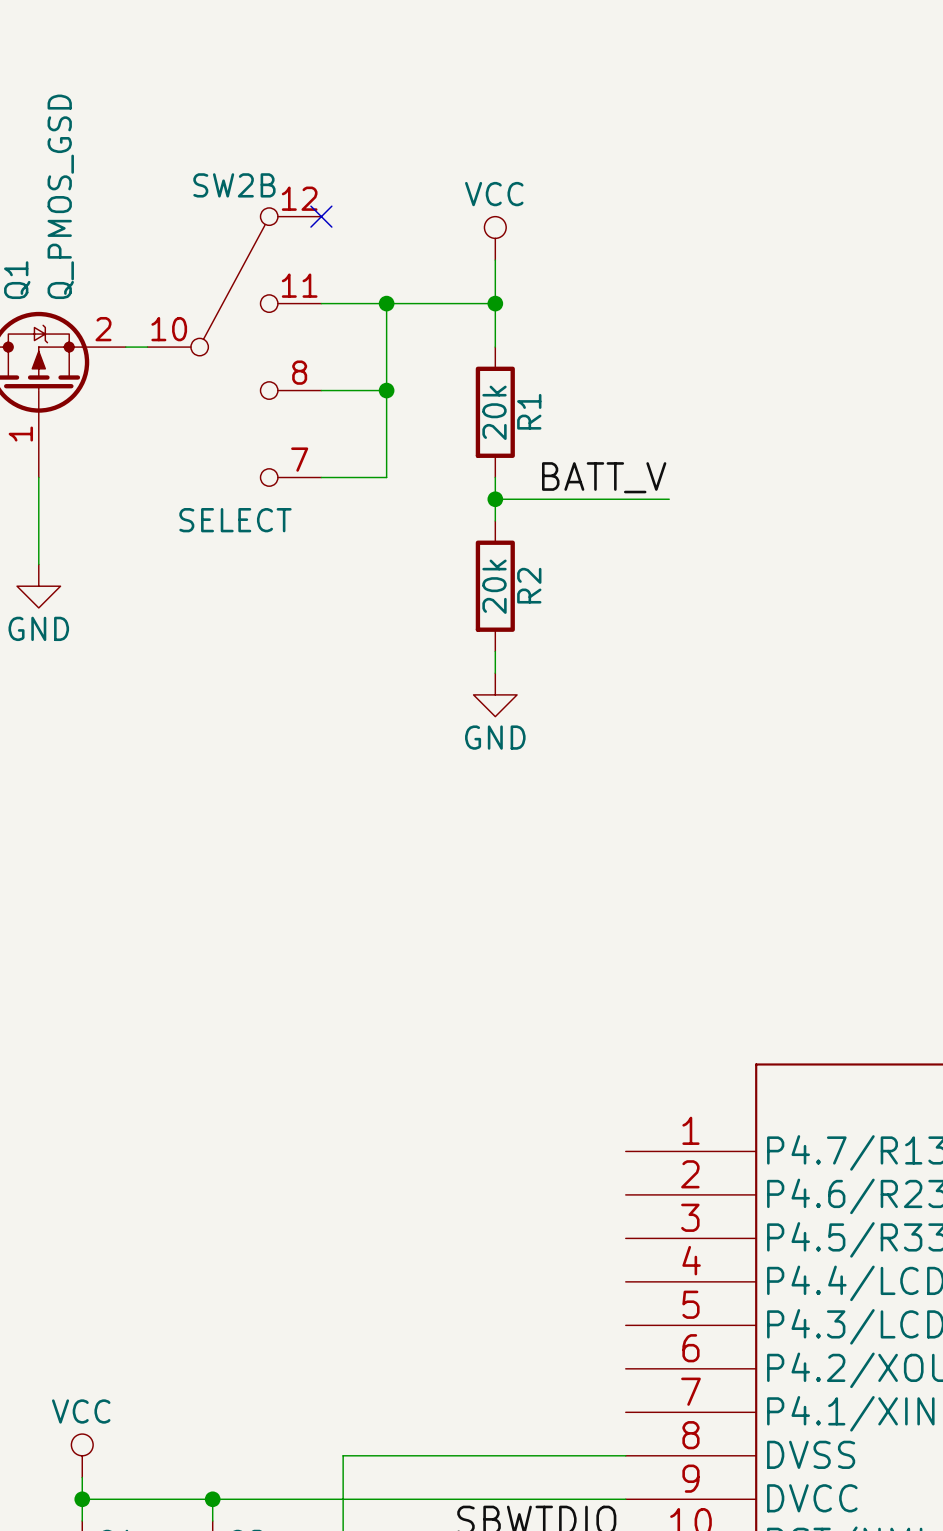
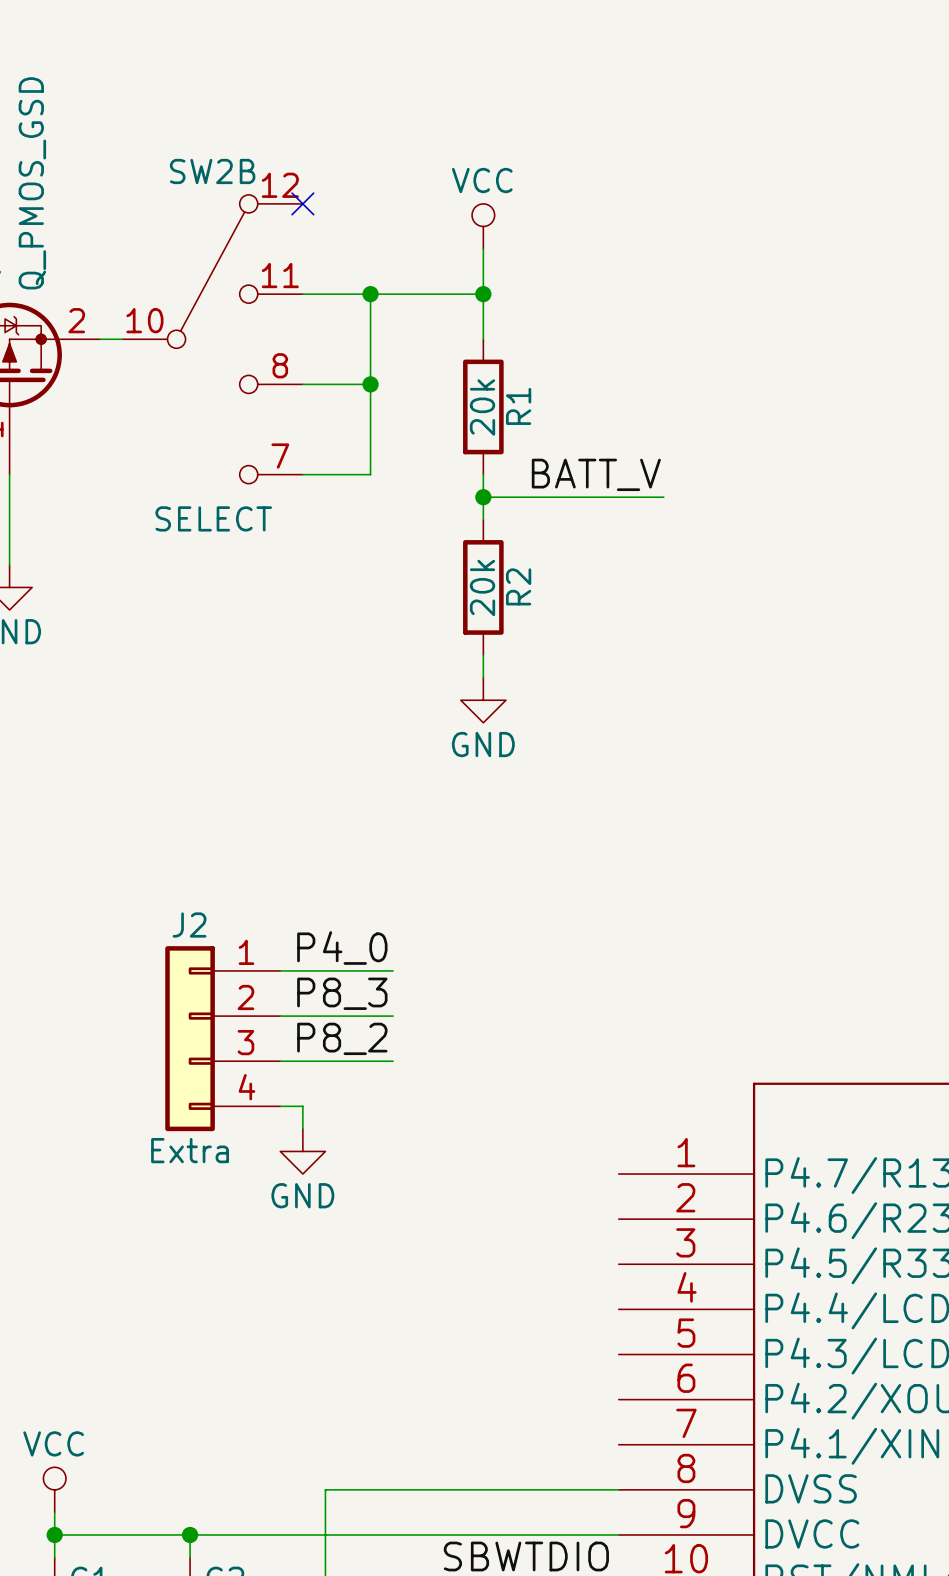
label: none -> P4_0 (342, 948)
wire: none -> (280, 970) (393, 970)
label: none -> P8_3 (342, 993)
wire: none -> (280, 1016) (393, 1016)
J2: none -> Extra (222, 1038)
label: none -> P8_2 (342, 1038)
wire: none -> (280, 1061) (393, 1061)
wire: none -> (280, 1106) (302, 1106) (302, 1128)
power symbol: none -> GND (302, 1151)

